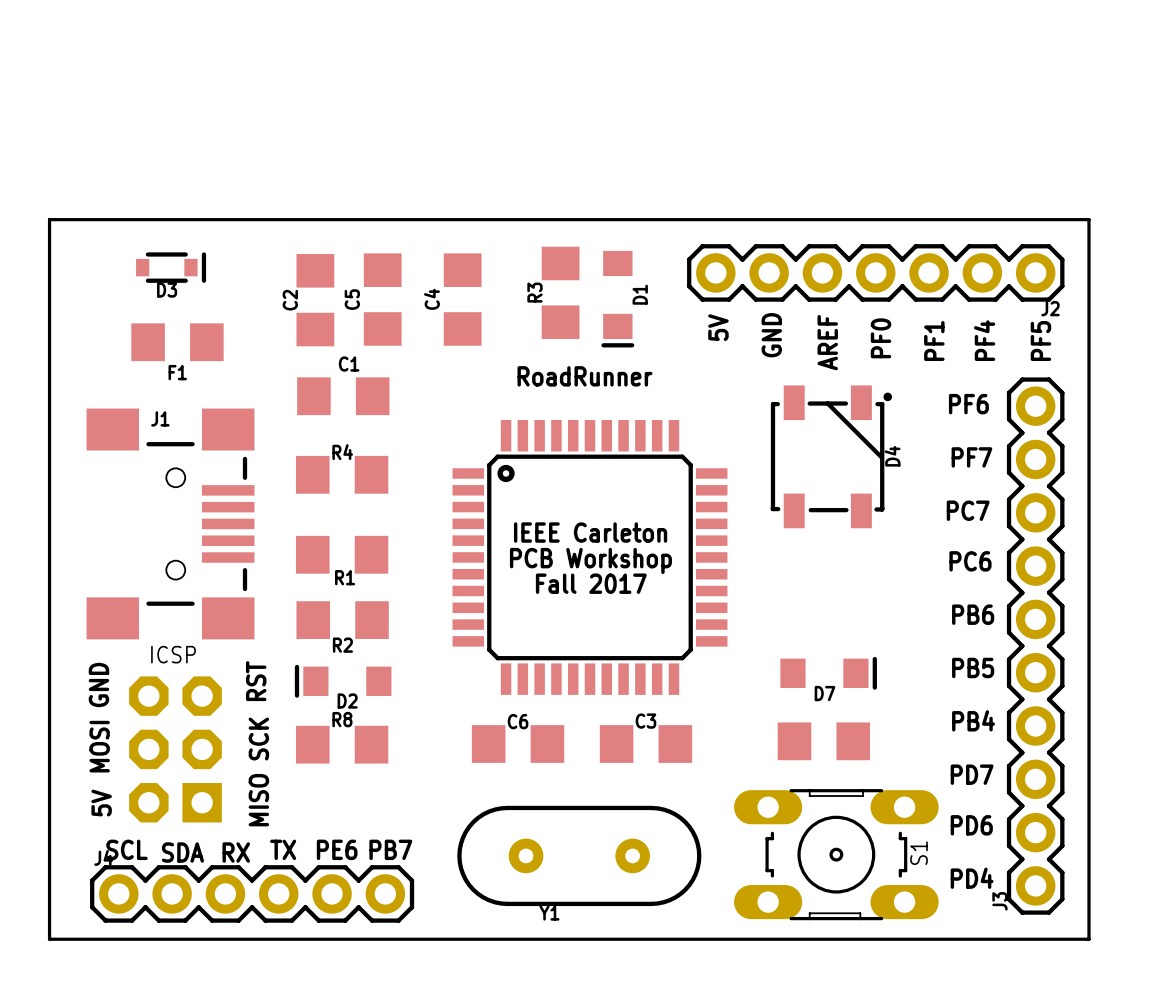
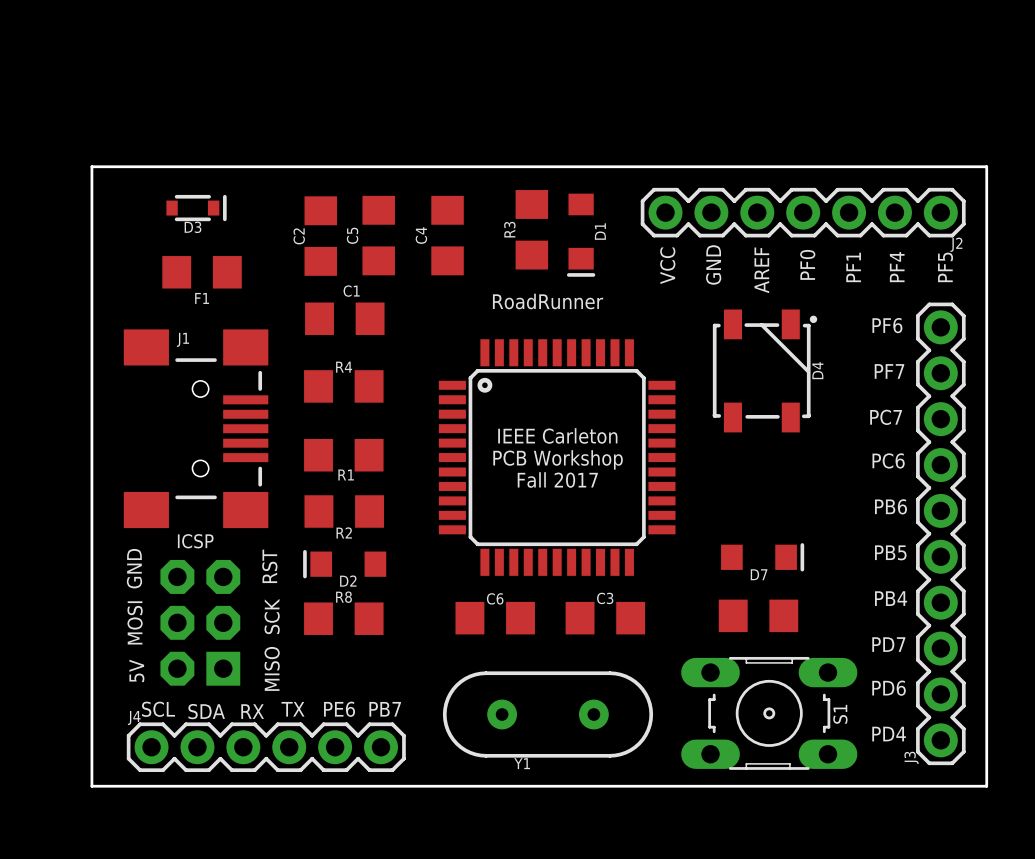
text: 5V (718, 327) -> VCC (667, 265)

